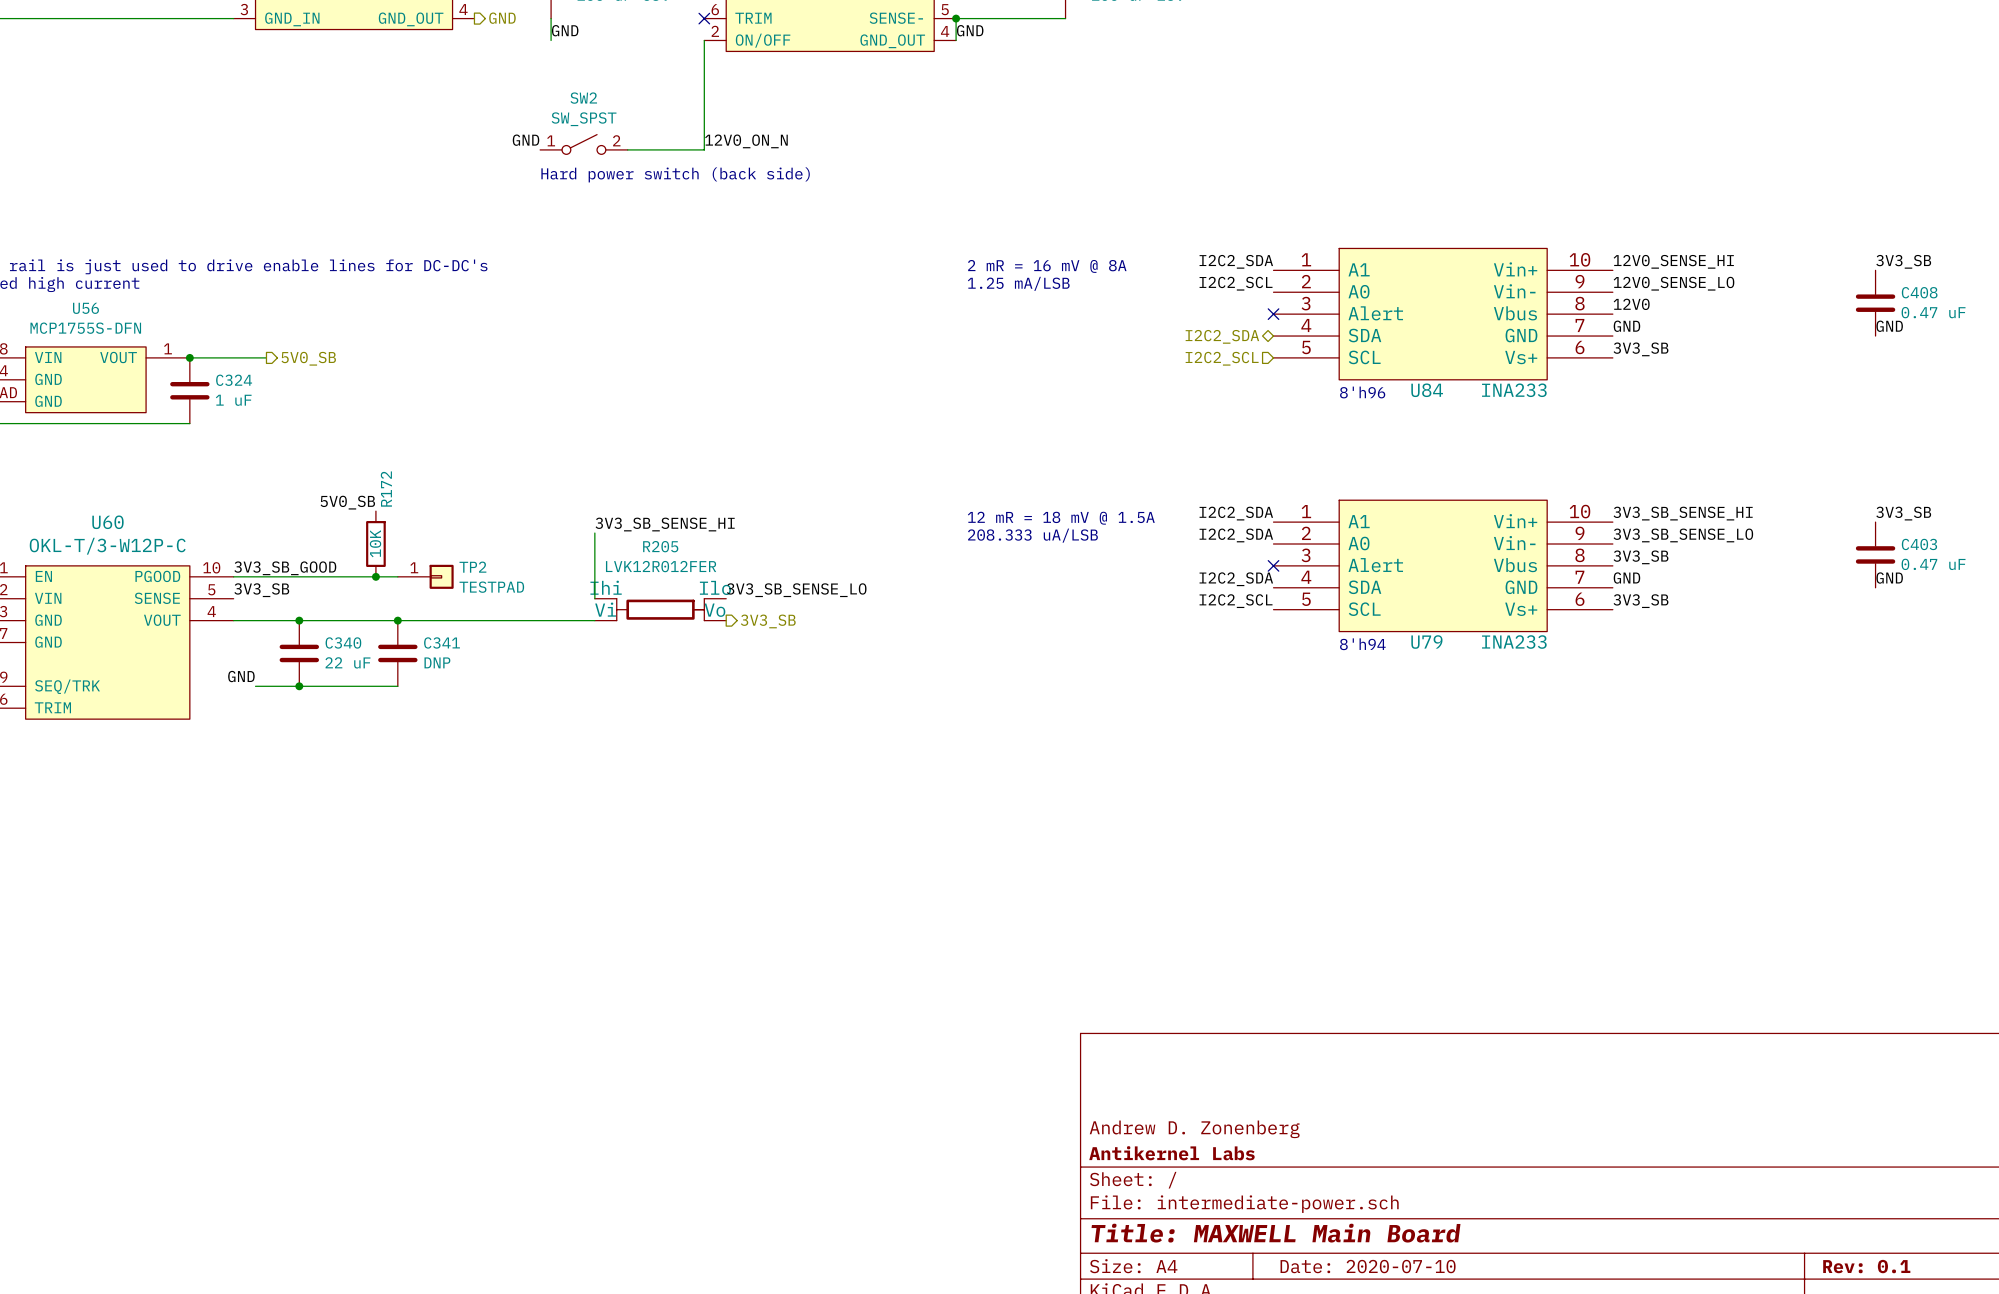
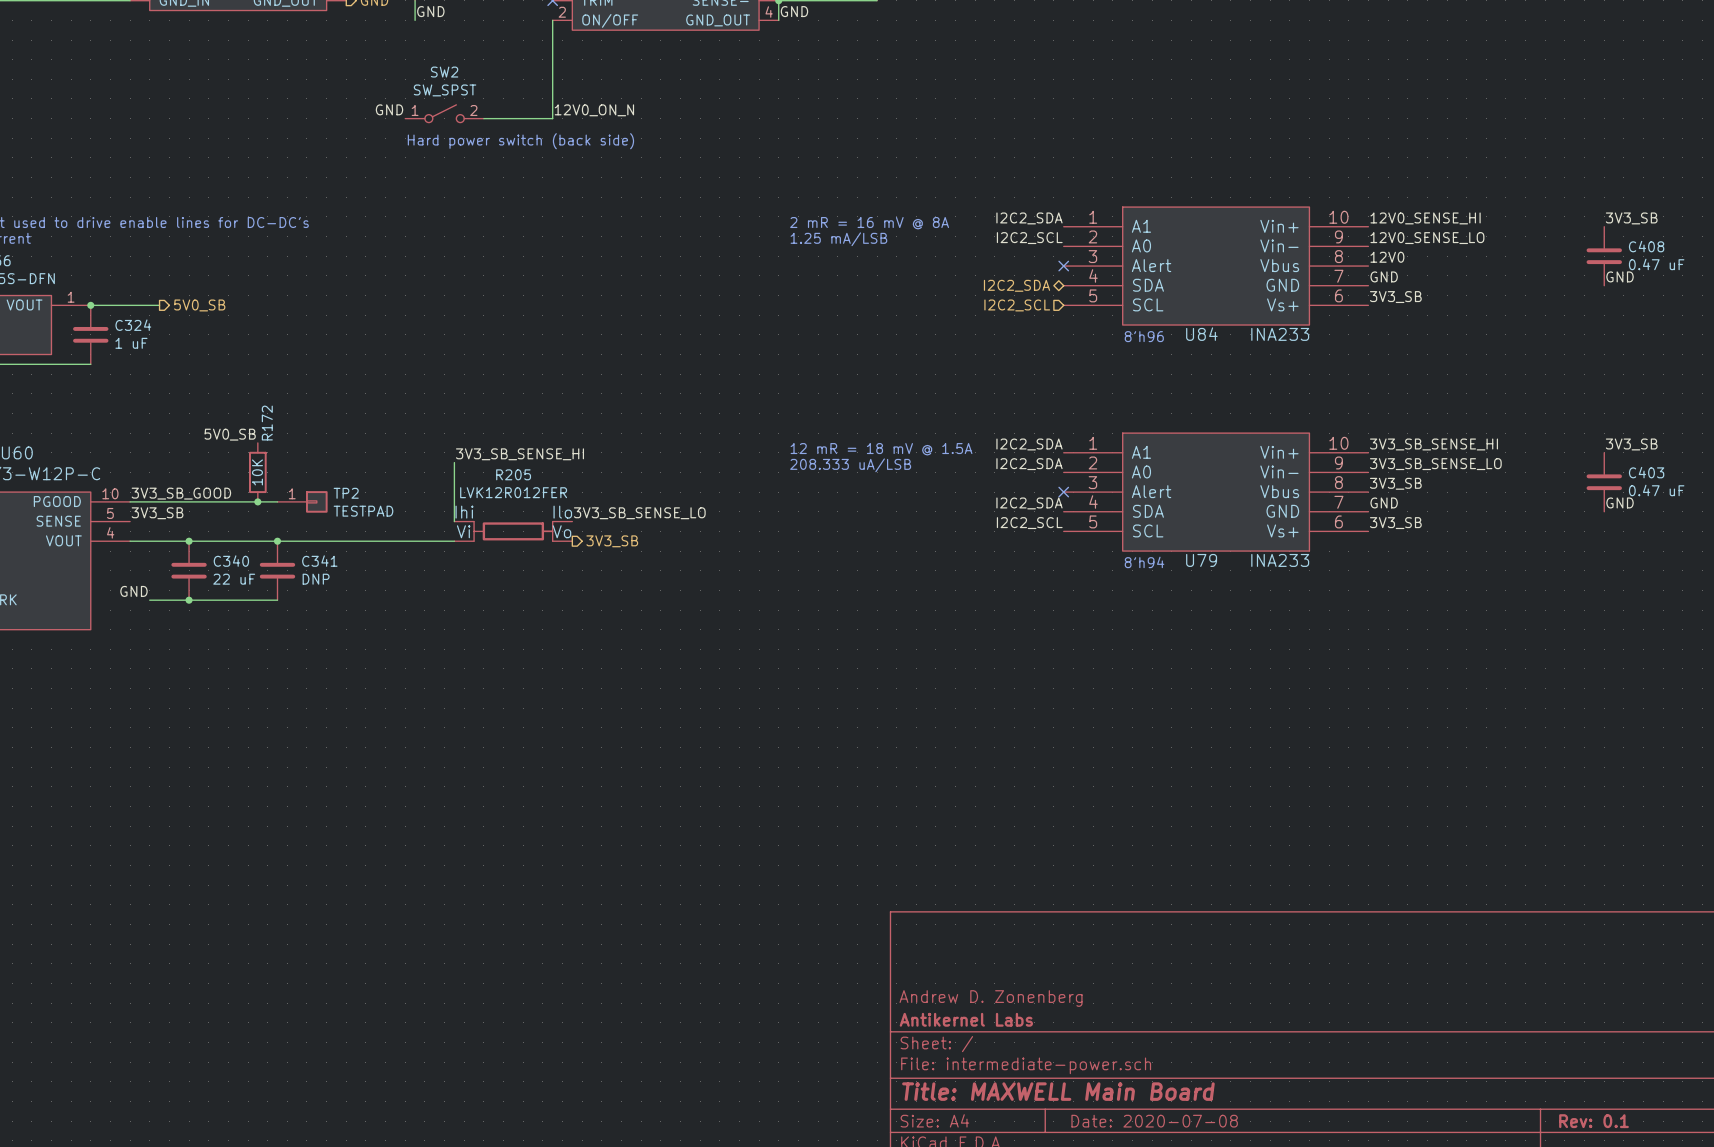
title block: Date: 2020-07-10 (1368, 1266) -> Date: 2020-07-08 (1154, 1121)

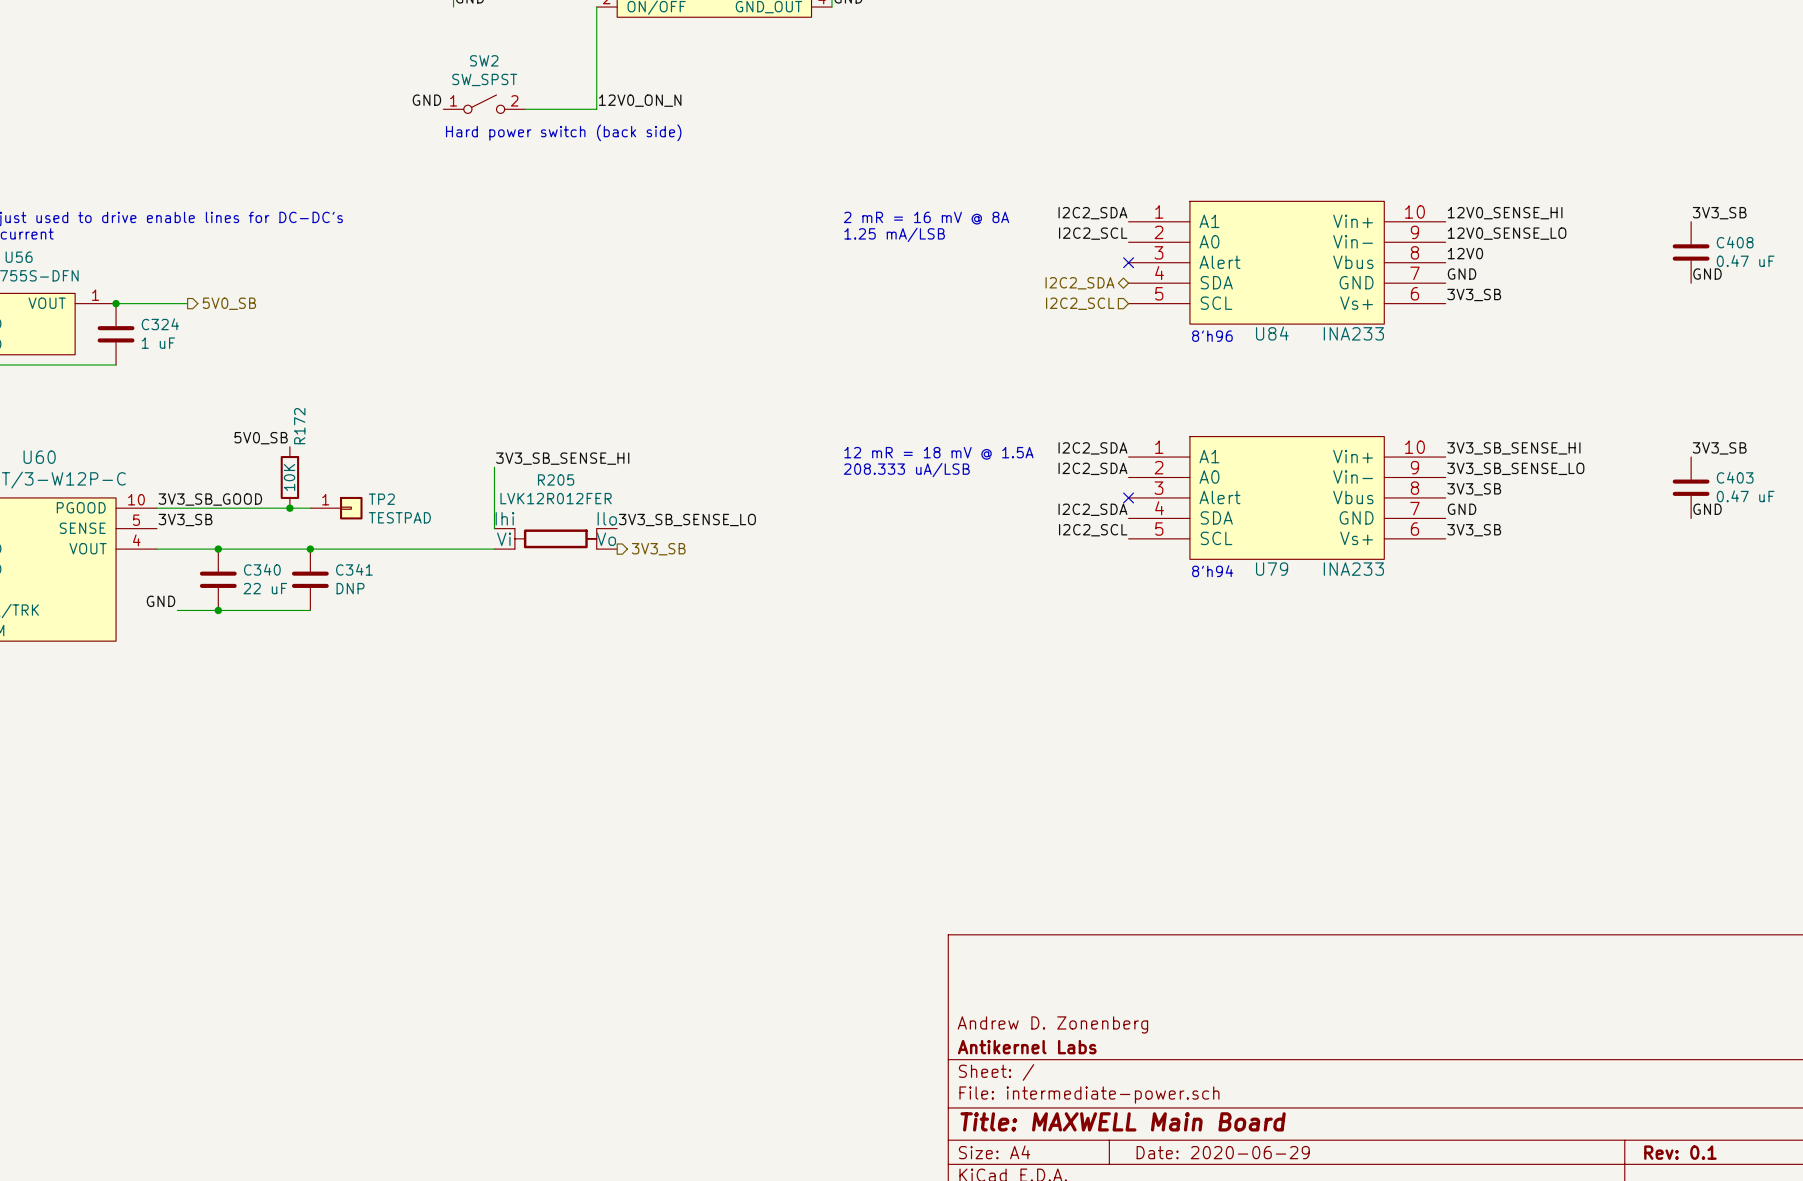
title block: Date: 2020-07-08 (1154, 1121) -> Date: 2020-06-29 (1223, 1152)

